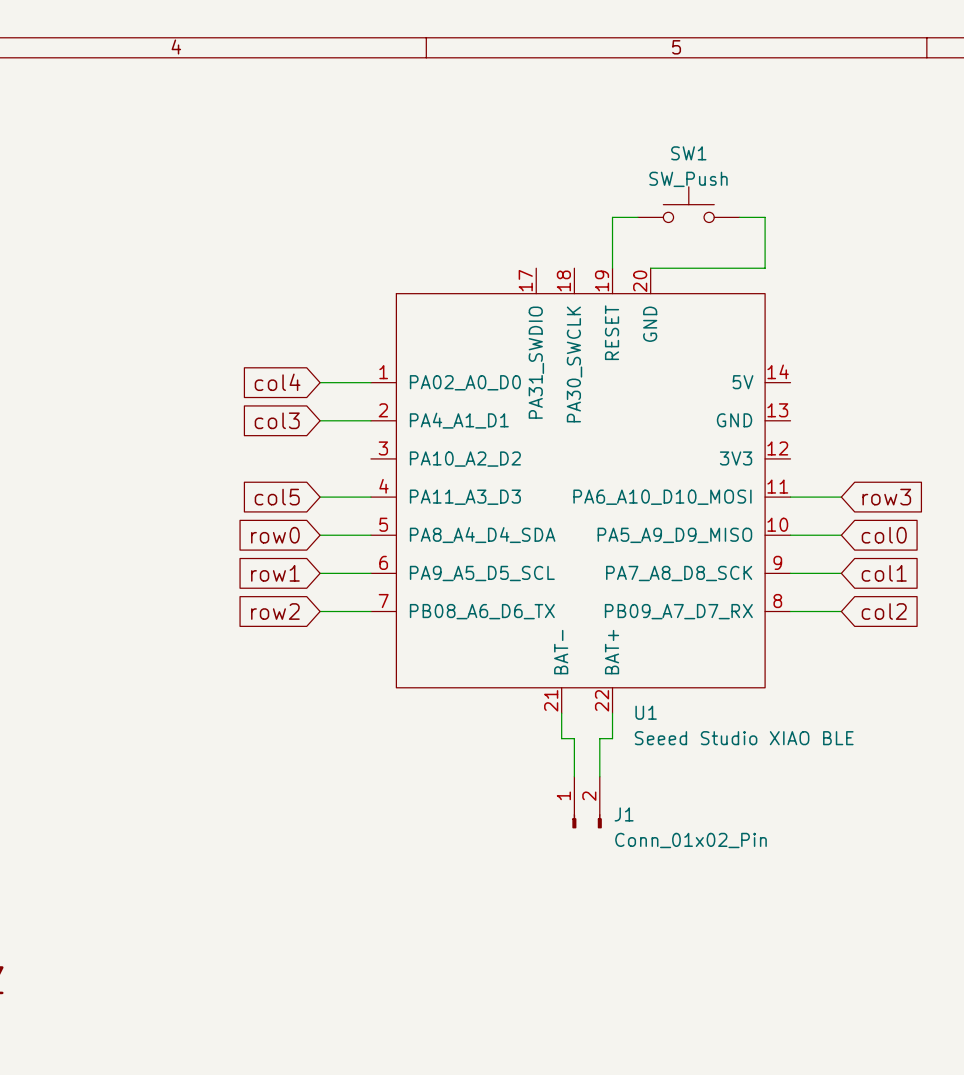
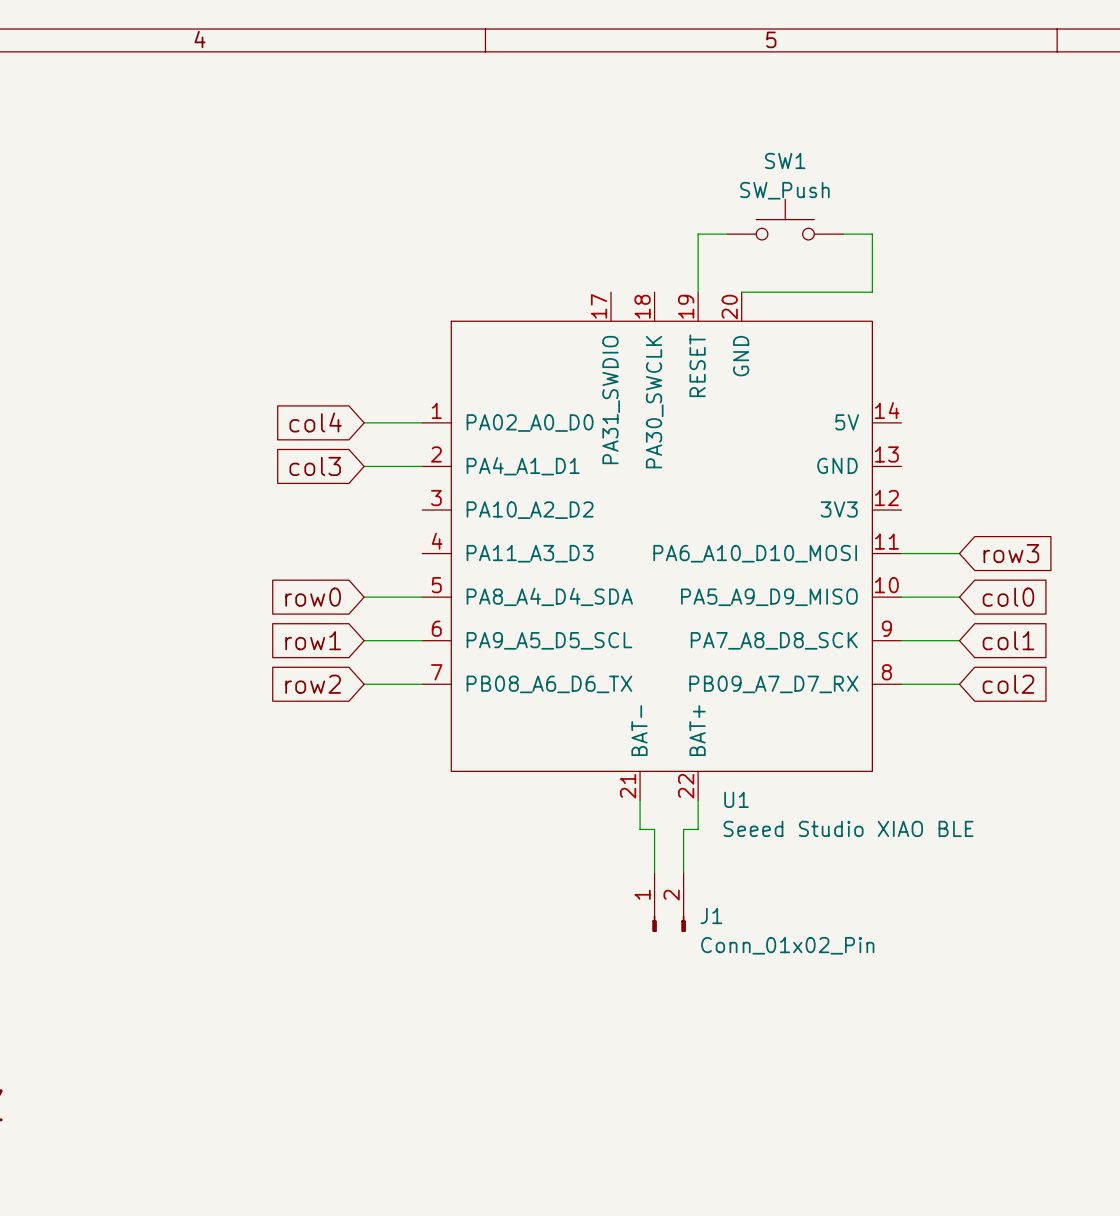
global label: col5 (277, 497) -> none
wire: (320, 497) (370, 497) -> none

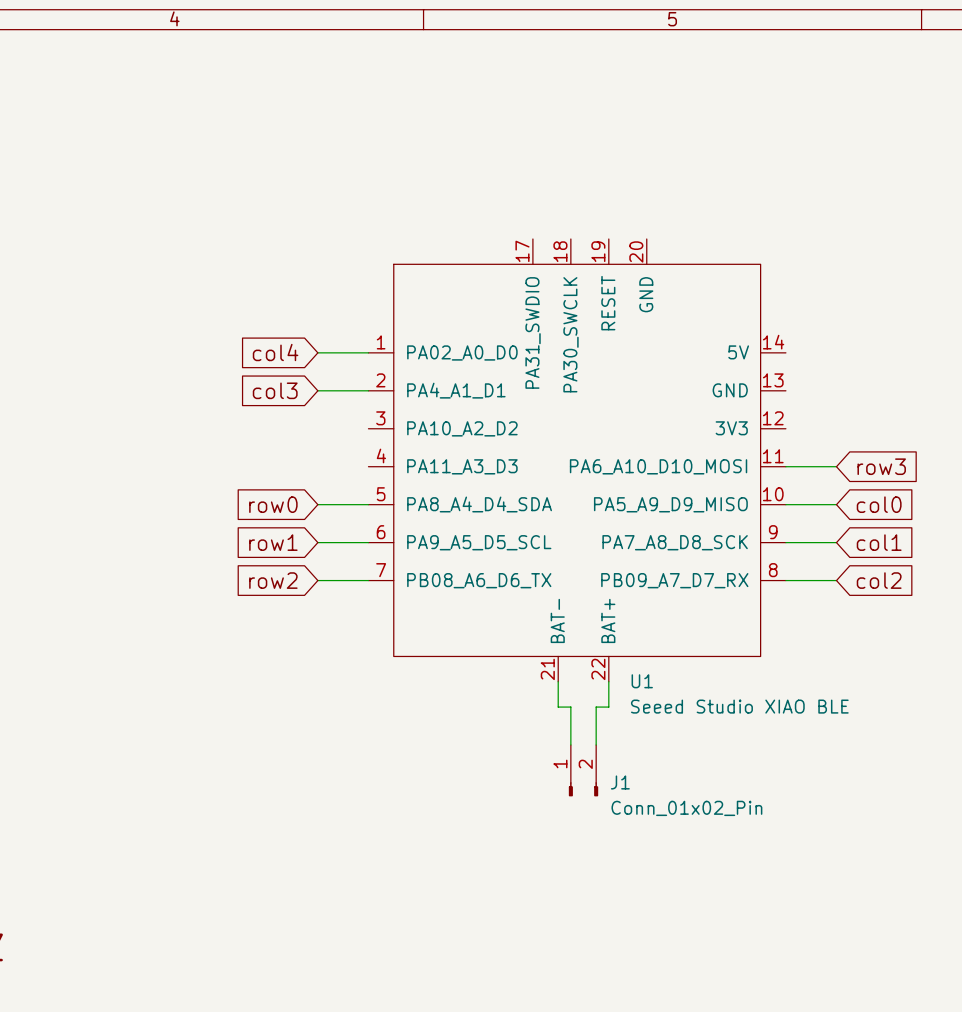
SW1: SW_Push (785, 219) -> none
wire: (727, 234) (698, 234) (698, 292) -> none
wire: (843, 234) (872, 234) (872, 292) (741, 292) -> none

